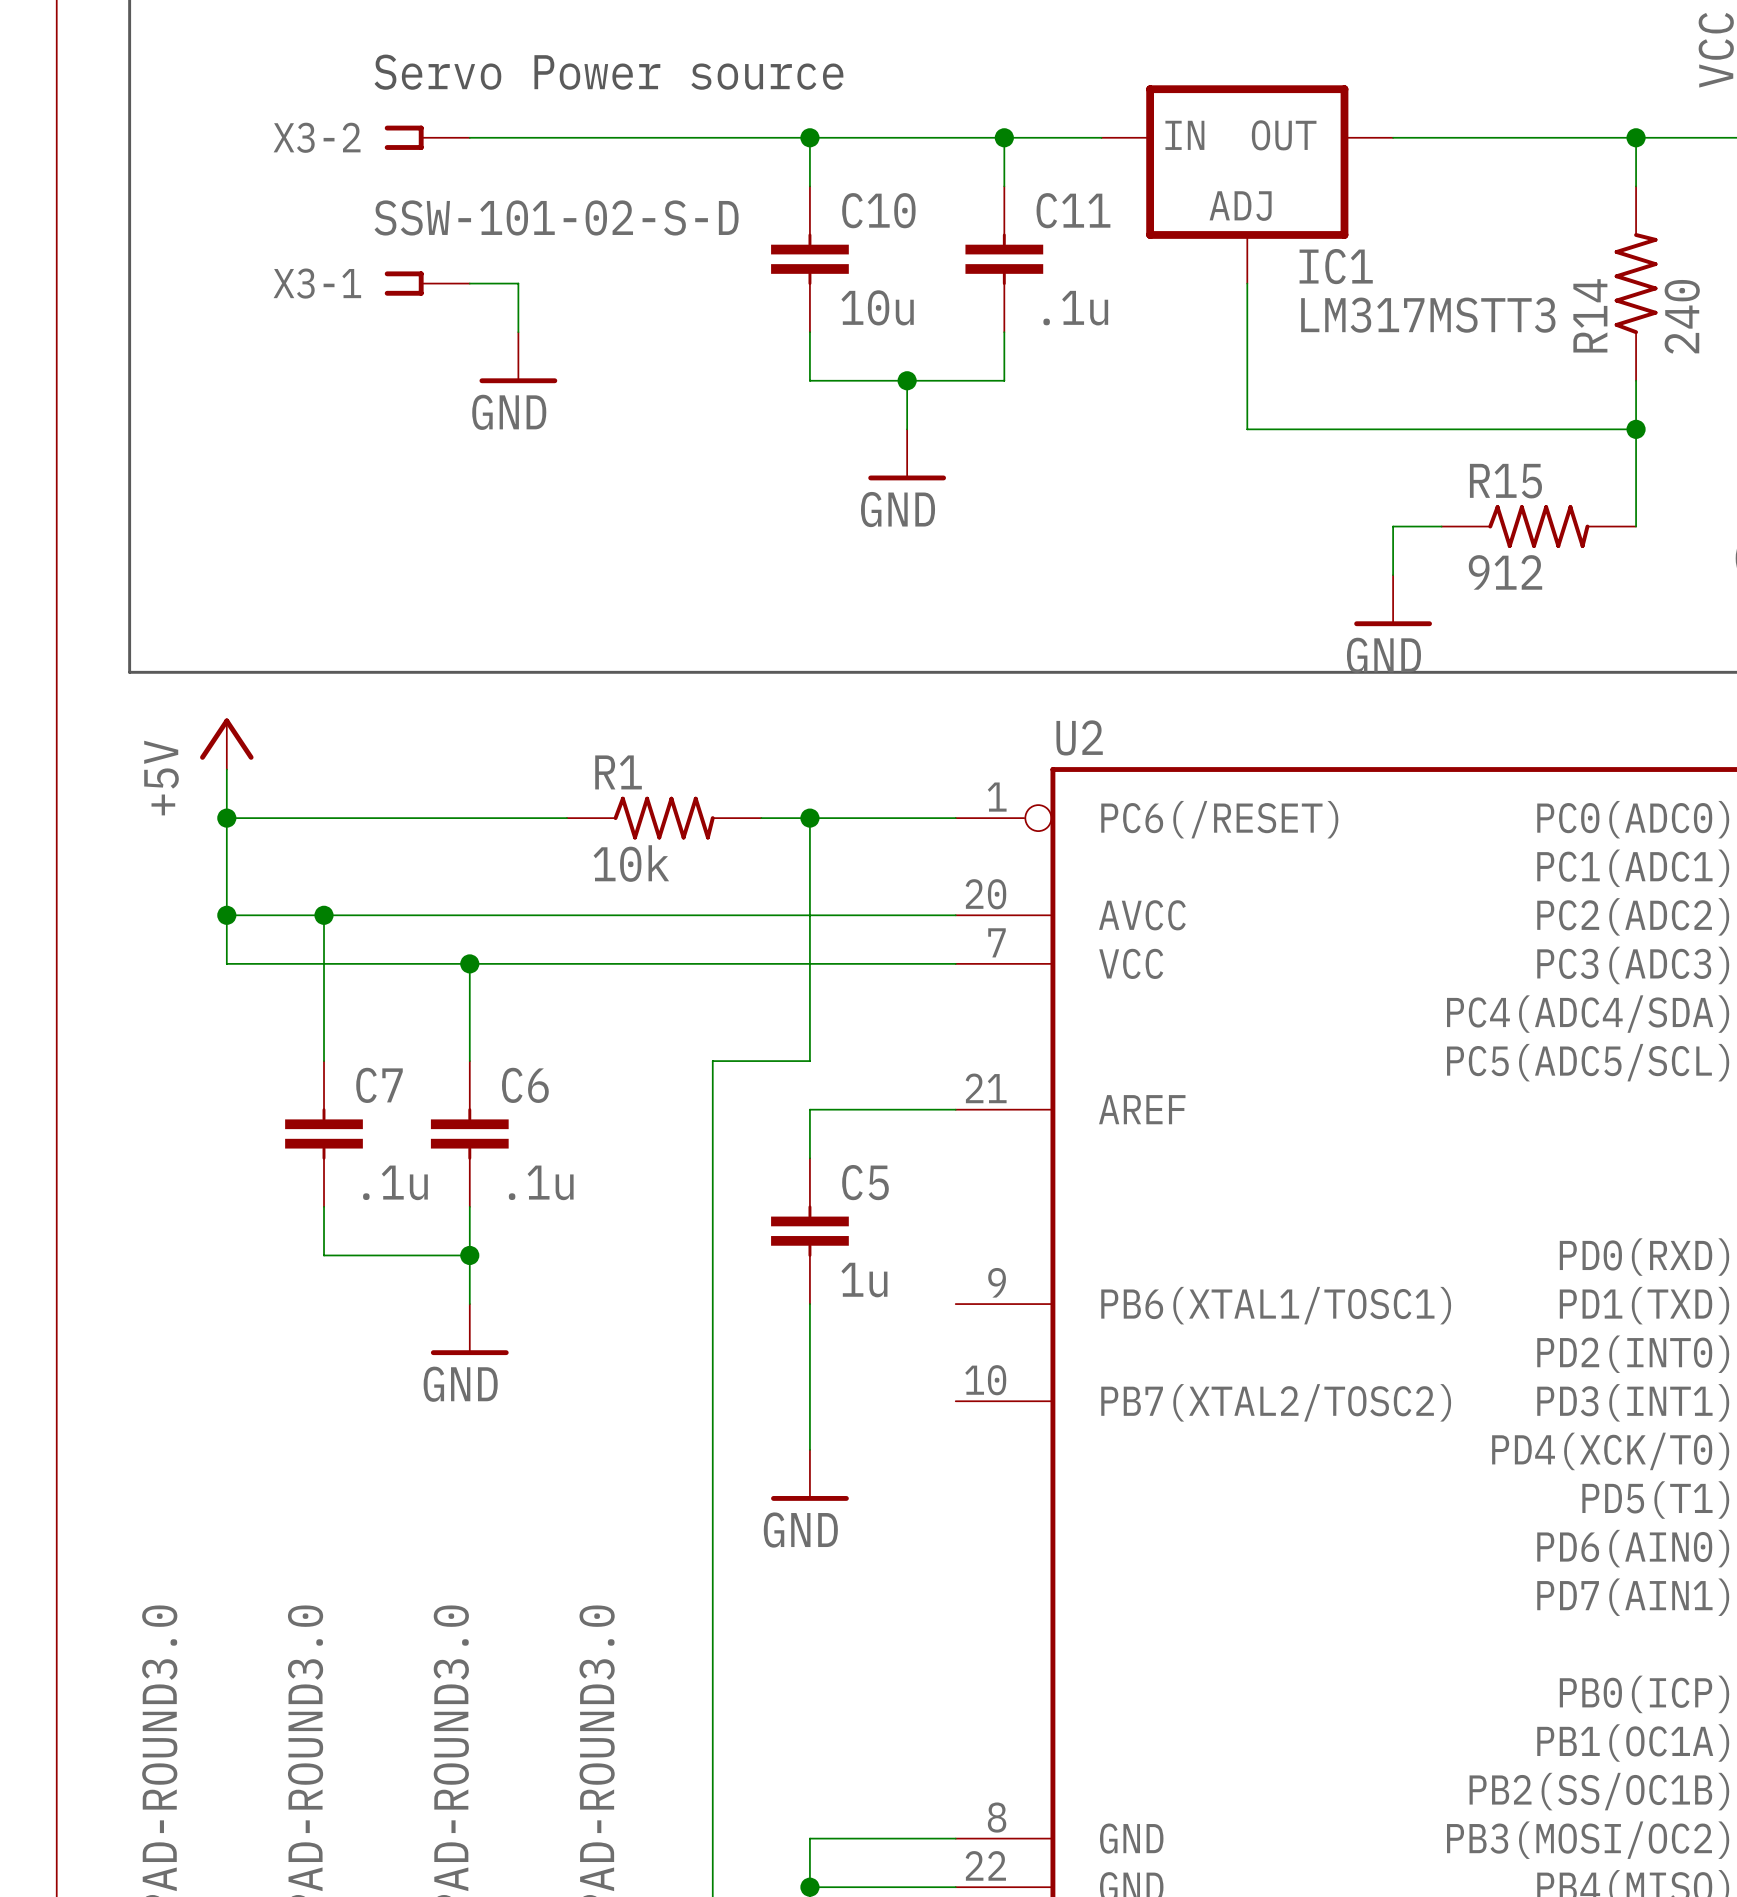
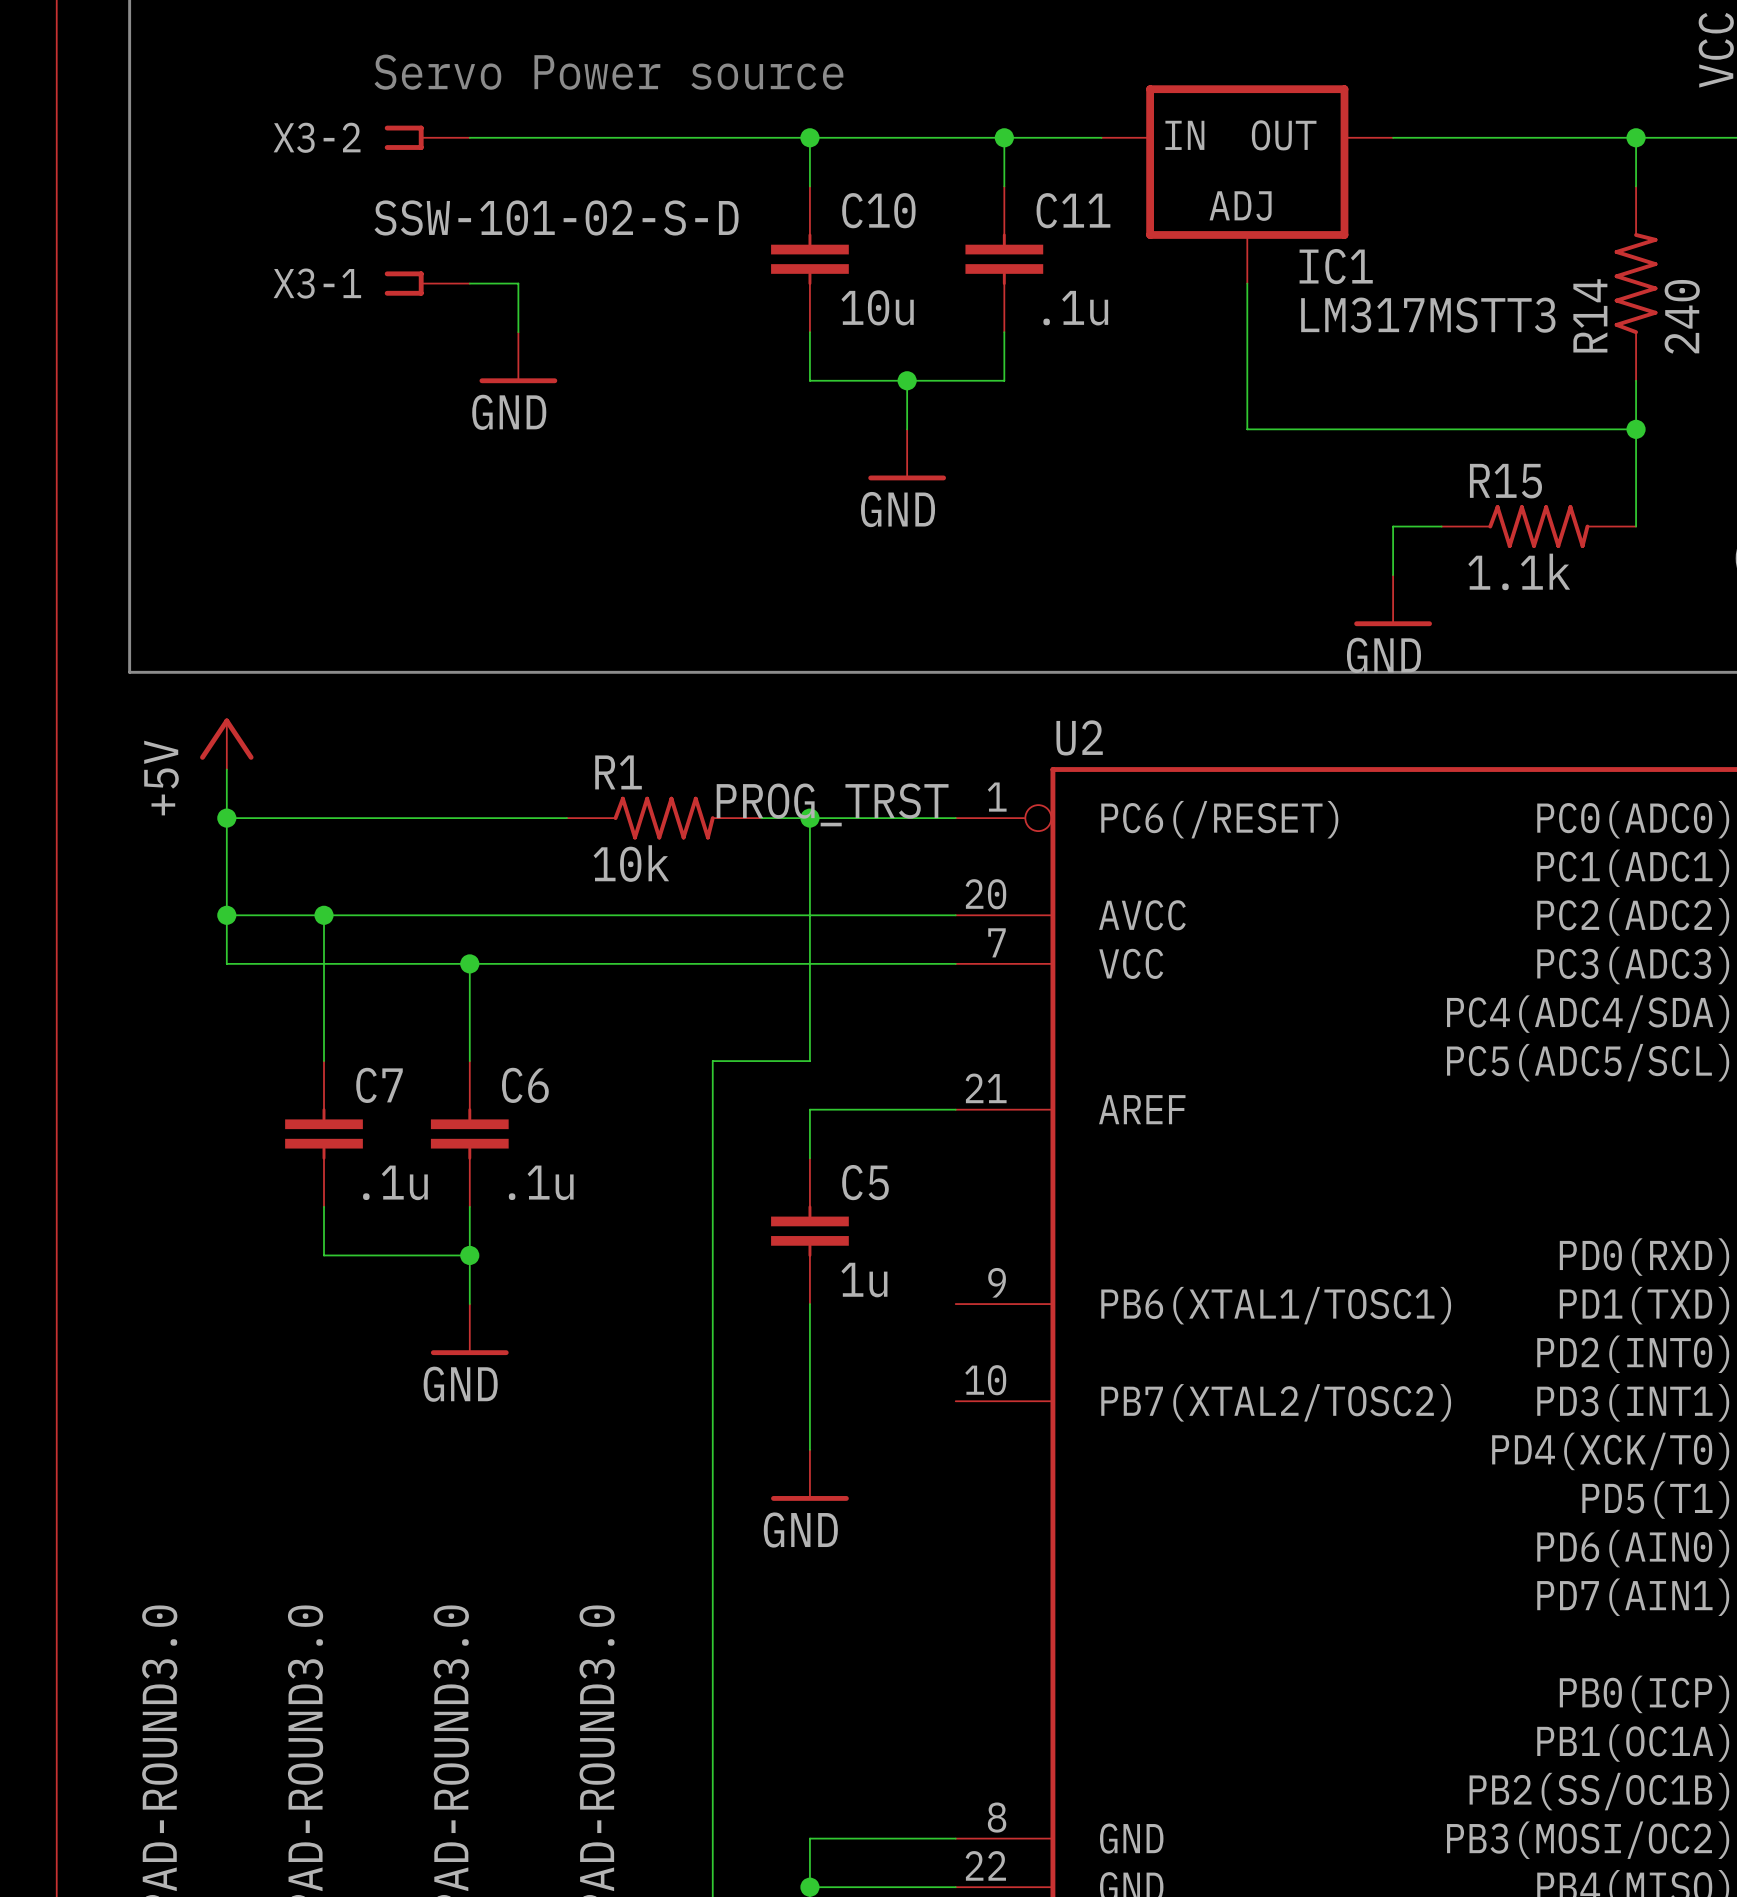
R15 value: 912 (1505, 572) -> 1.1k (1519, 571)
label: none -> PROG_TRST (832, 804)

